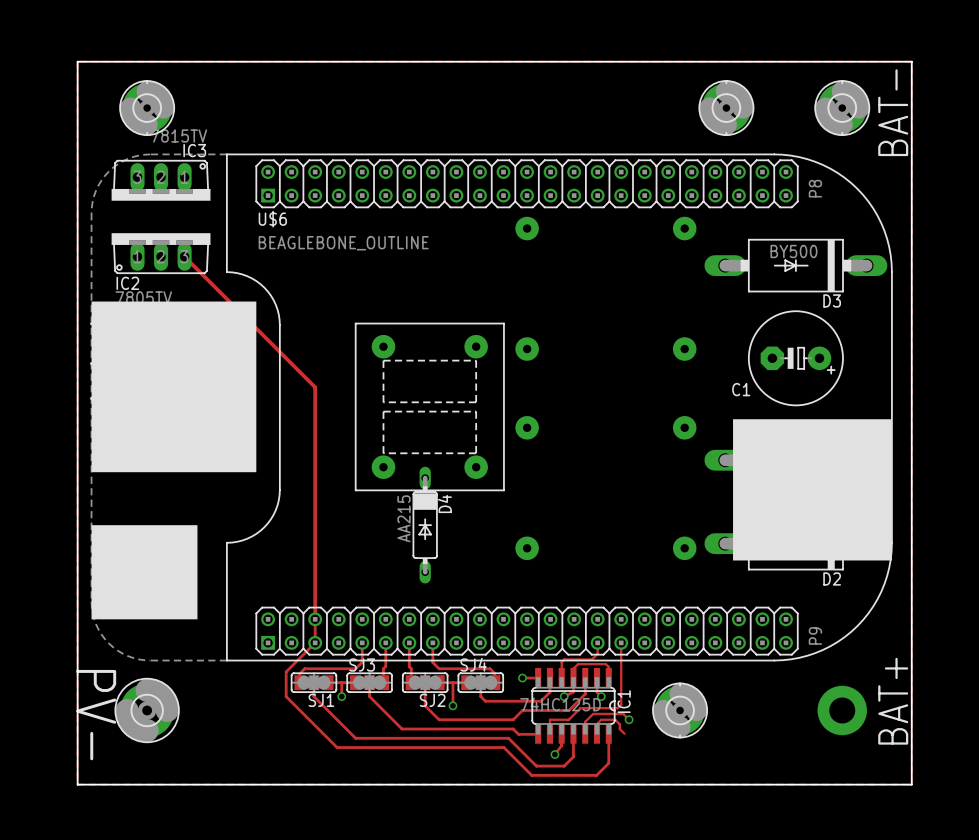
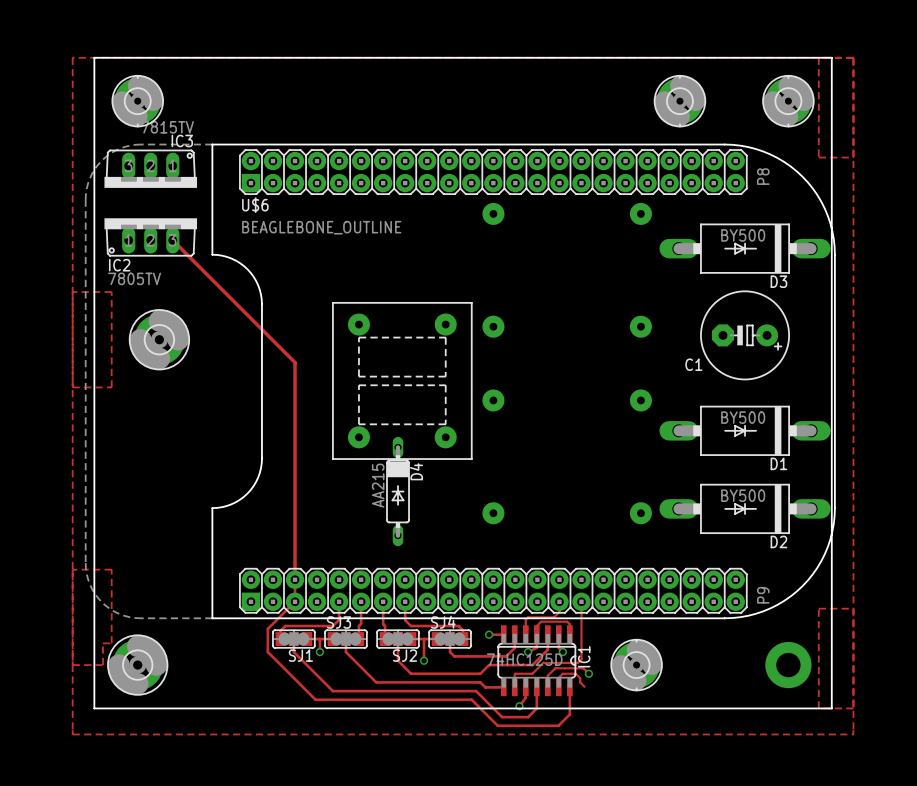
board edge: (100, 61) (77, 61) (77, 784) (911, 784) (911, 61) (888, 61) -> (94, 57) (94, 708) (831, 708) (831, 57)
zone outline: none -> (818, 57) (818, 157) (853, 157)
text: BAT- (893, 112) -> none
U$6 footprint: [90, 153, 893, 662] -> [85, 143, 836, 619]
zone outline: none -> (72, 292) (111, 292) (111, 387) (72, 387)
zone outline: none -> (72, 569) (111, 569) (111, 643) (103, 643) (103, 665) (72, 665)
zone outline: none -> (853, 608) (818, 608) (818, 708) (853, 708)
text: BAT+ (893, 701) -> none
text: PV- (96, 715) -> none

